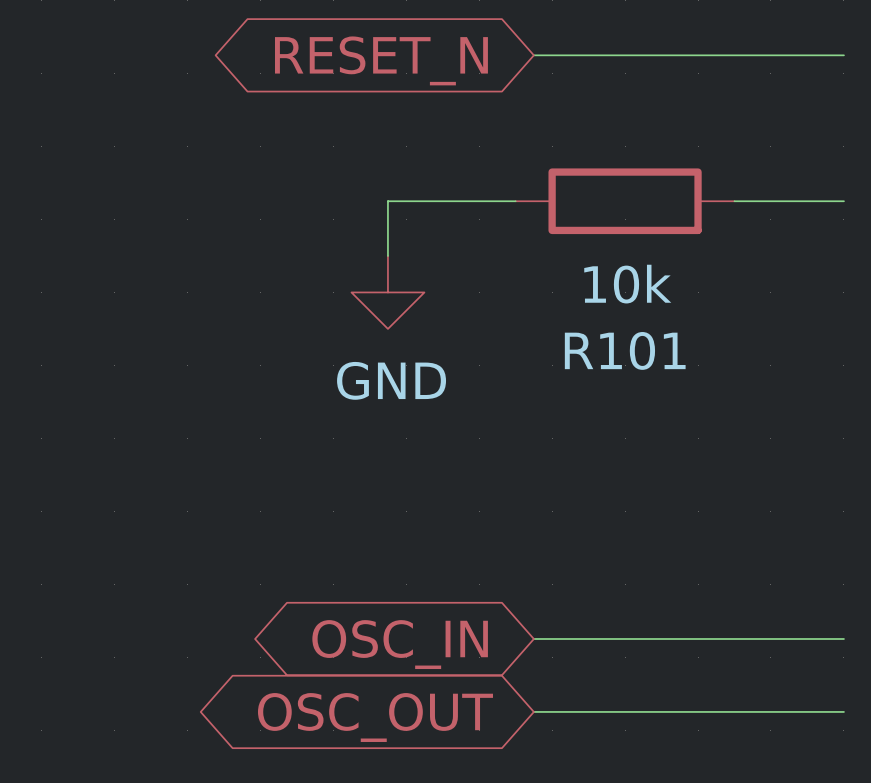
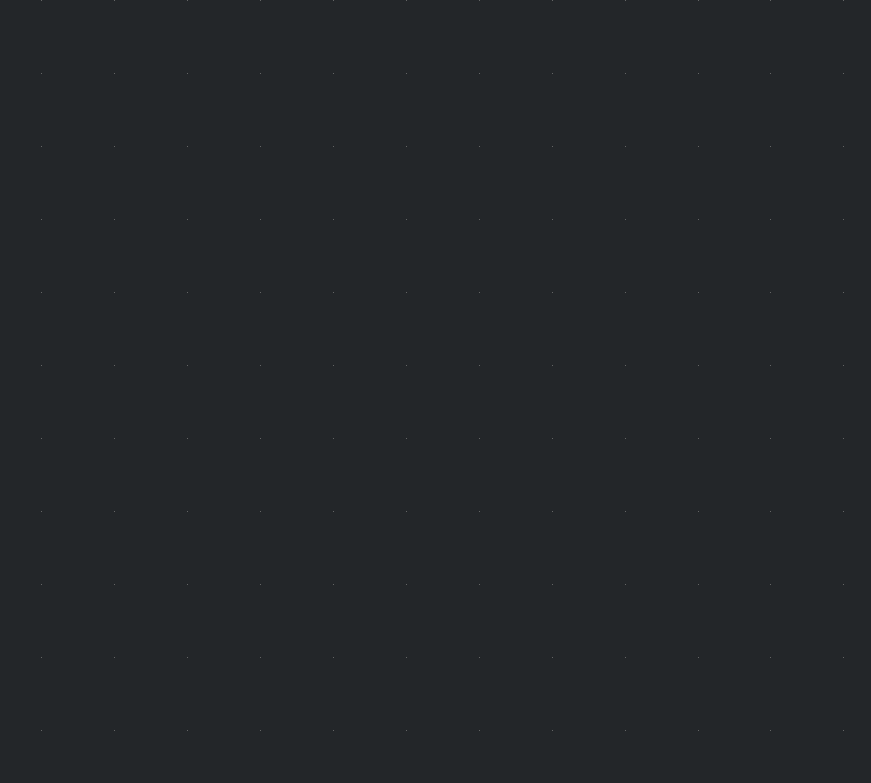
wire: (533, 55) (843, 55) -> none
global label: RESET_N (381, 60) -> none
wire: (515, 201) (387, 201) (387, 255) -> none
R101: 10k (625, 201) -> none
wire: (734, 201) (843, 201) -> none
power symbol: GND (387, 292) -> none
wire: (533, 638) (843, 638) -> none
global label: OSC_IN (400, 644) -> none
wire: (533, 711) (843, 711) -> none
global label: OSC_OUT (375, 717) -> none

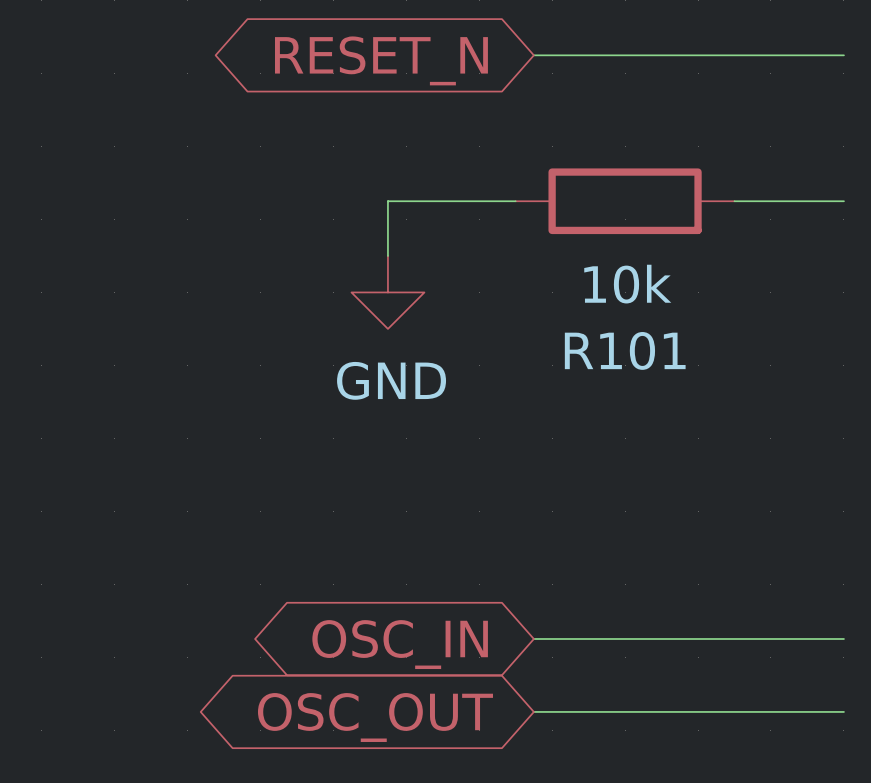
wire: none -> (533, 55) (843, 55)
global label: none -> RESET_N (381, 60)
wire: none -> (515, 201) (387, 201) (387, 255)
R101: none -> 10k (625, 201)
wire: none -> (734, 201) (843, 201)
power symbol: none -> GND (387, 292)
wire: none -> (533, 638) (843, 638)
global label: none -> OSC_IN (400, 644)
wire: none -> (533, 711) (843, 711)
global label: none -> OSC_OUT (375, 717)

